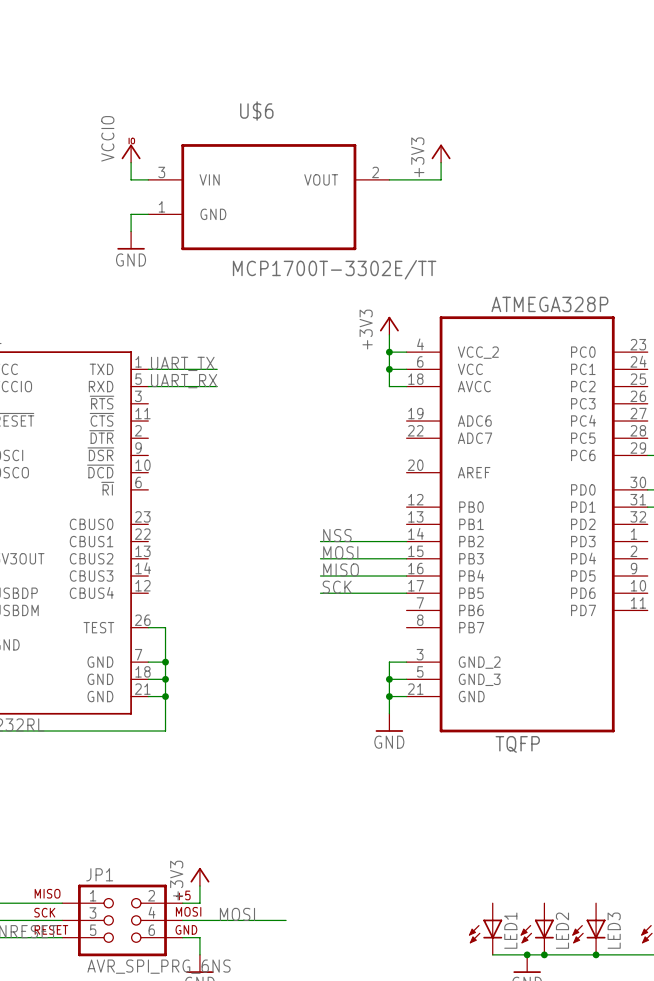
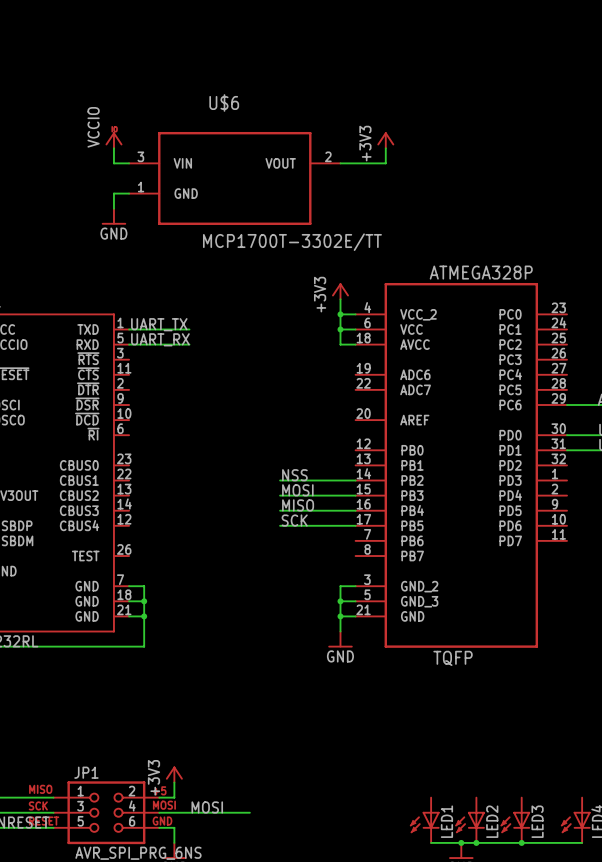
wire: (148, 627) (165, 627) (165, 662) -> none
junction: (165, 662) -> none

